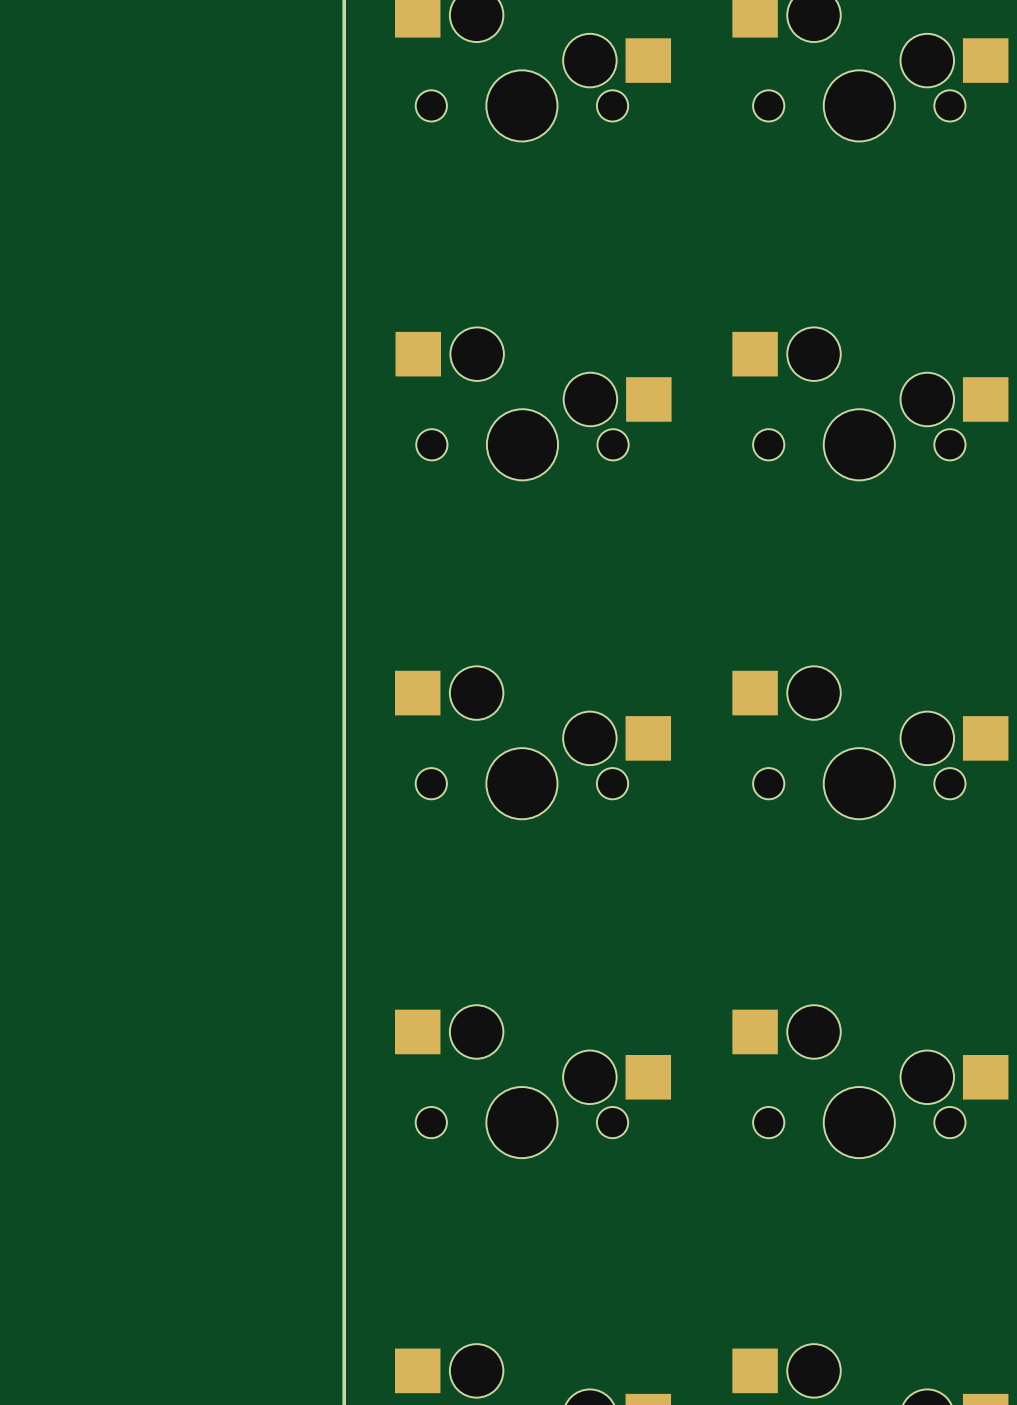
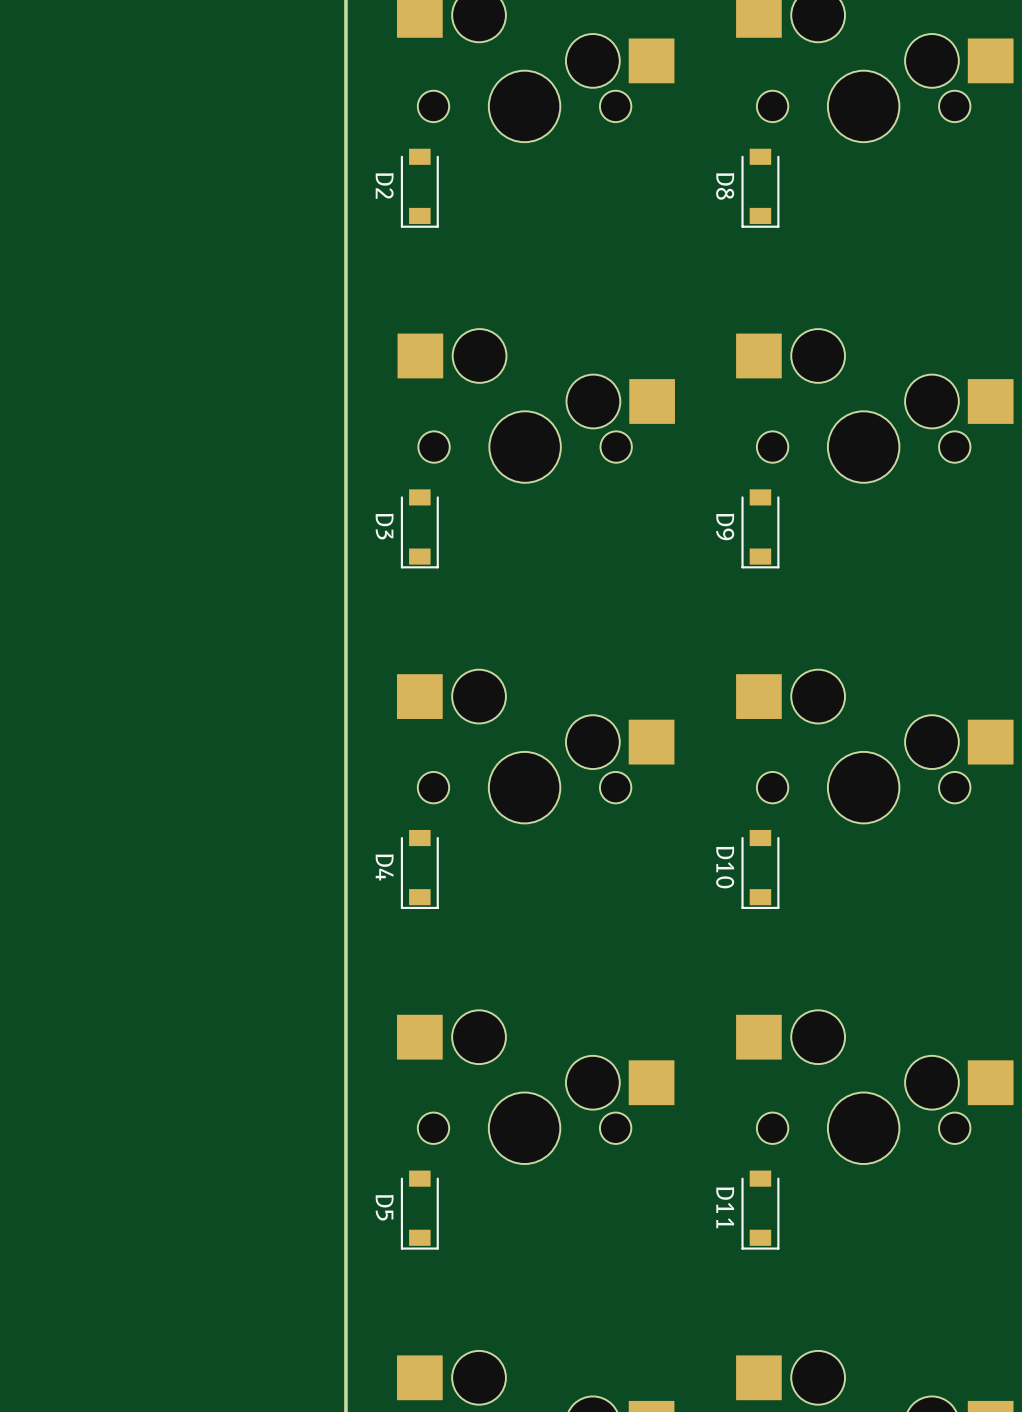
D2: none -> (419, 188)
D8: none -> (760, 188)
D3: none -> (419, 528)
D9: none -> (760, 528)
D4: none -> (419, 869)
D10: none -> (760, 869)
D5: none -> (419, 1210)
D11: none -> (760, 1210)

